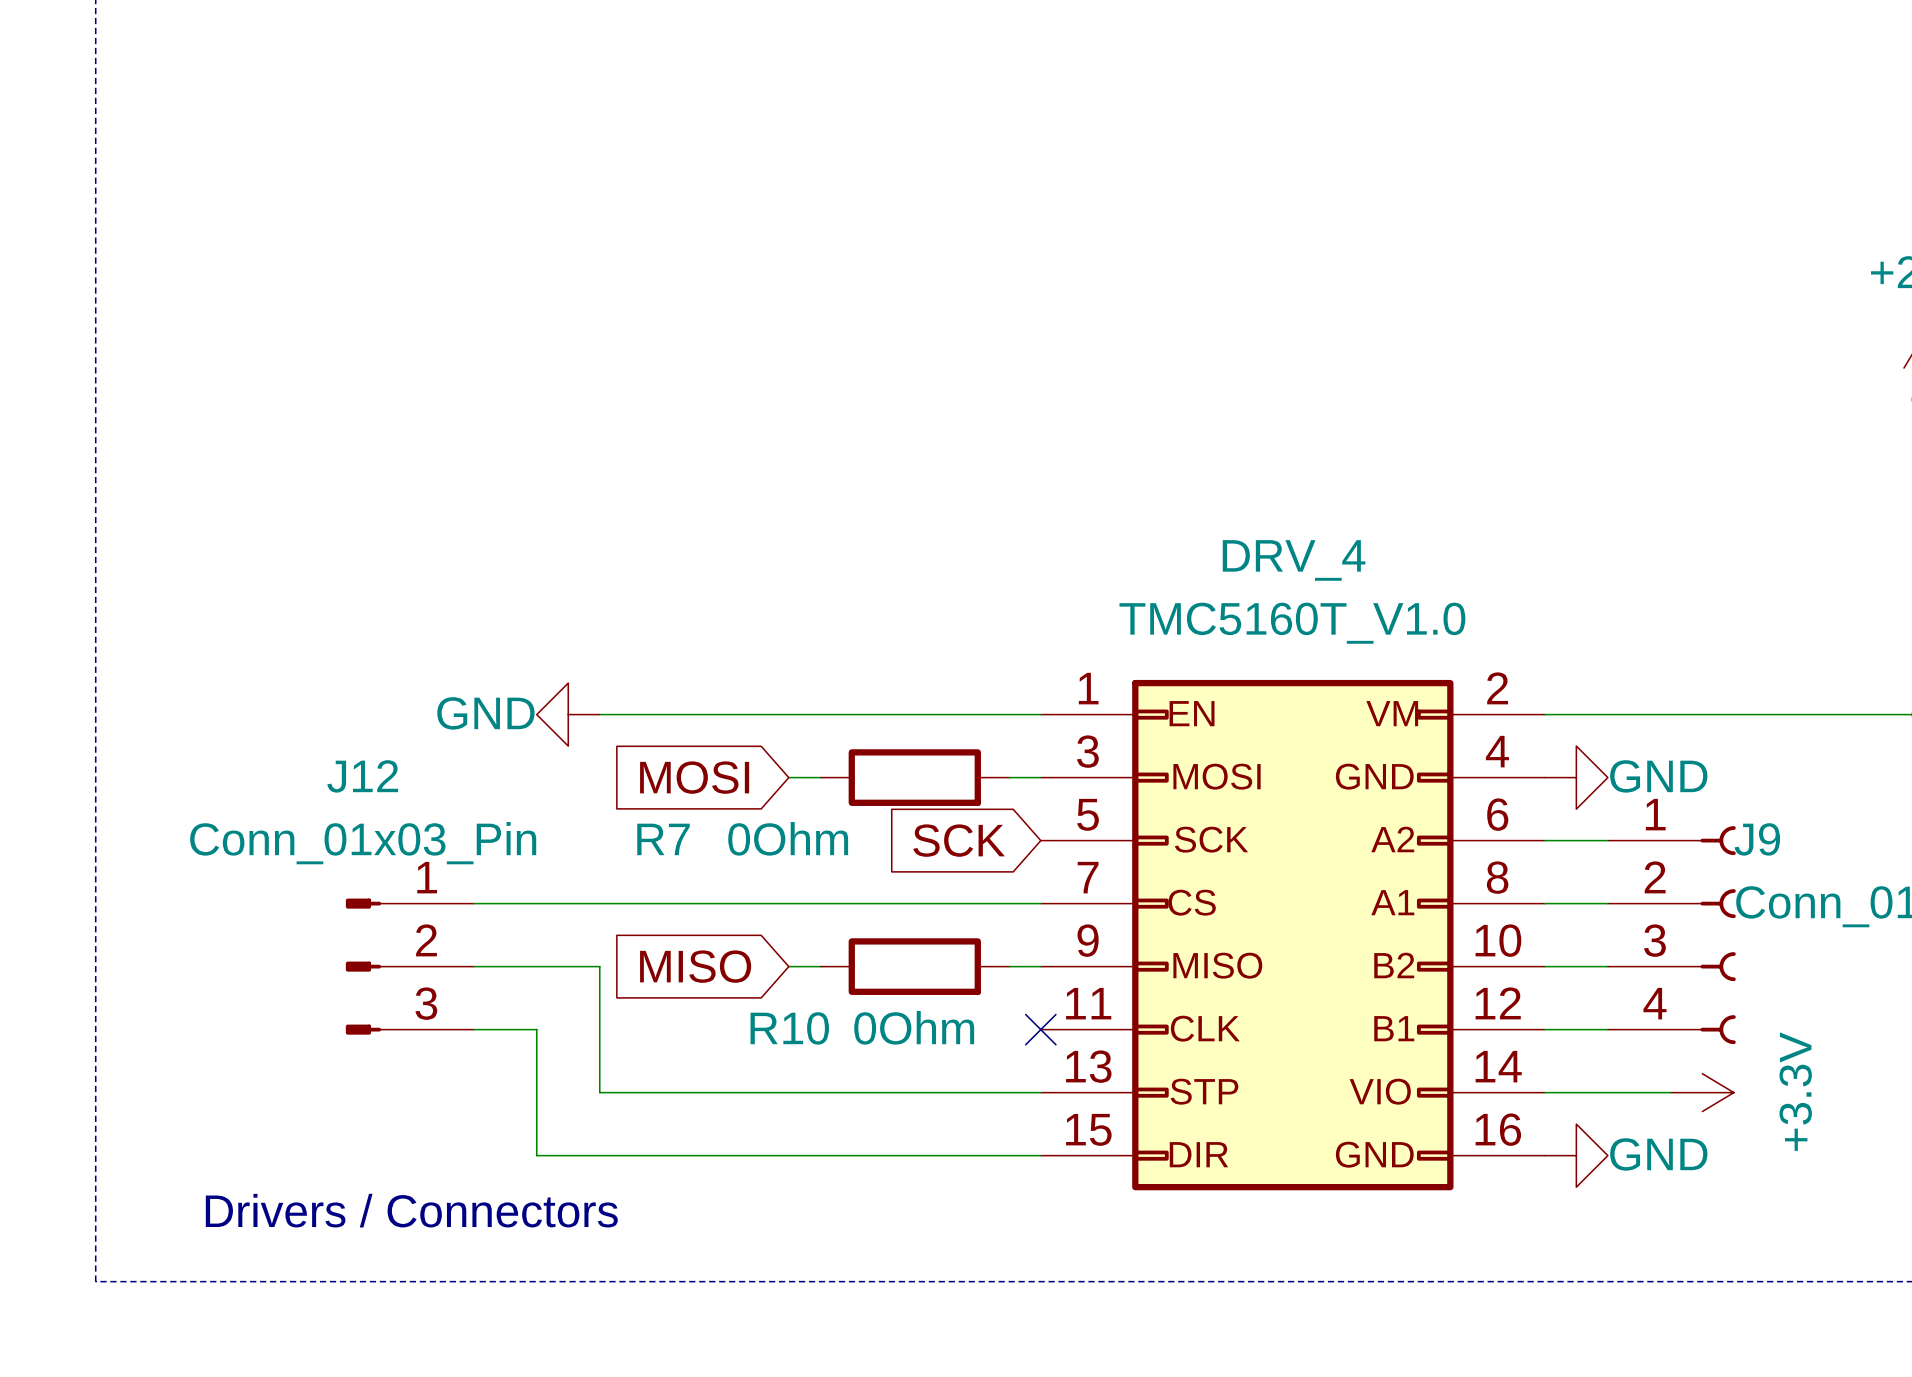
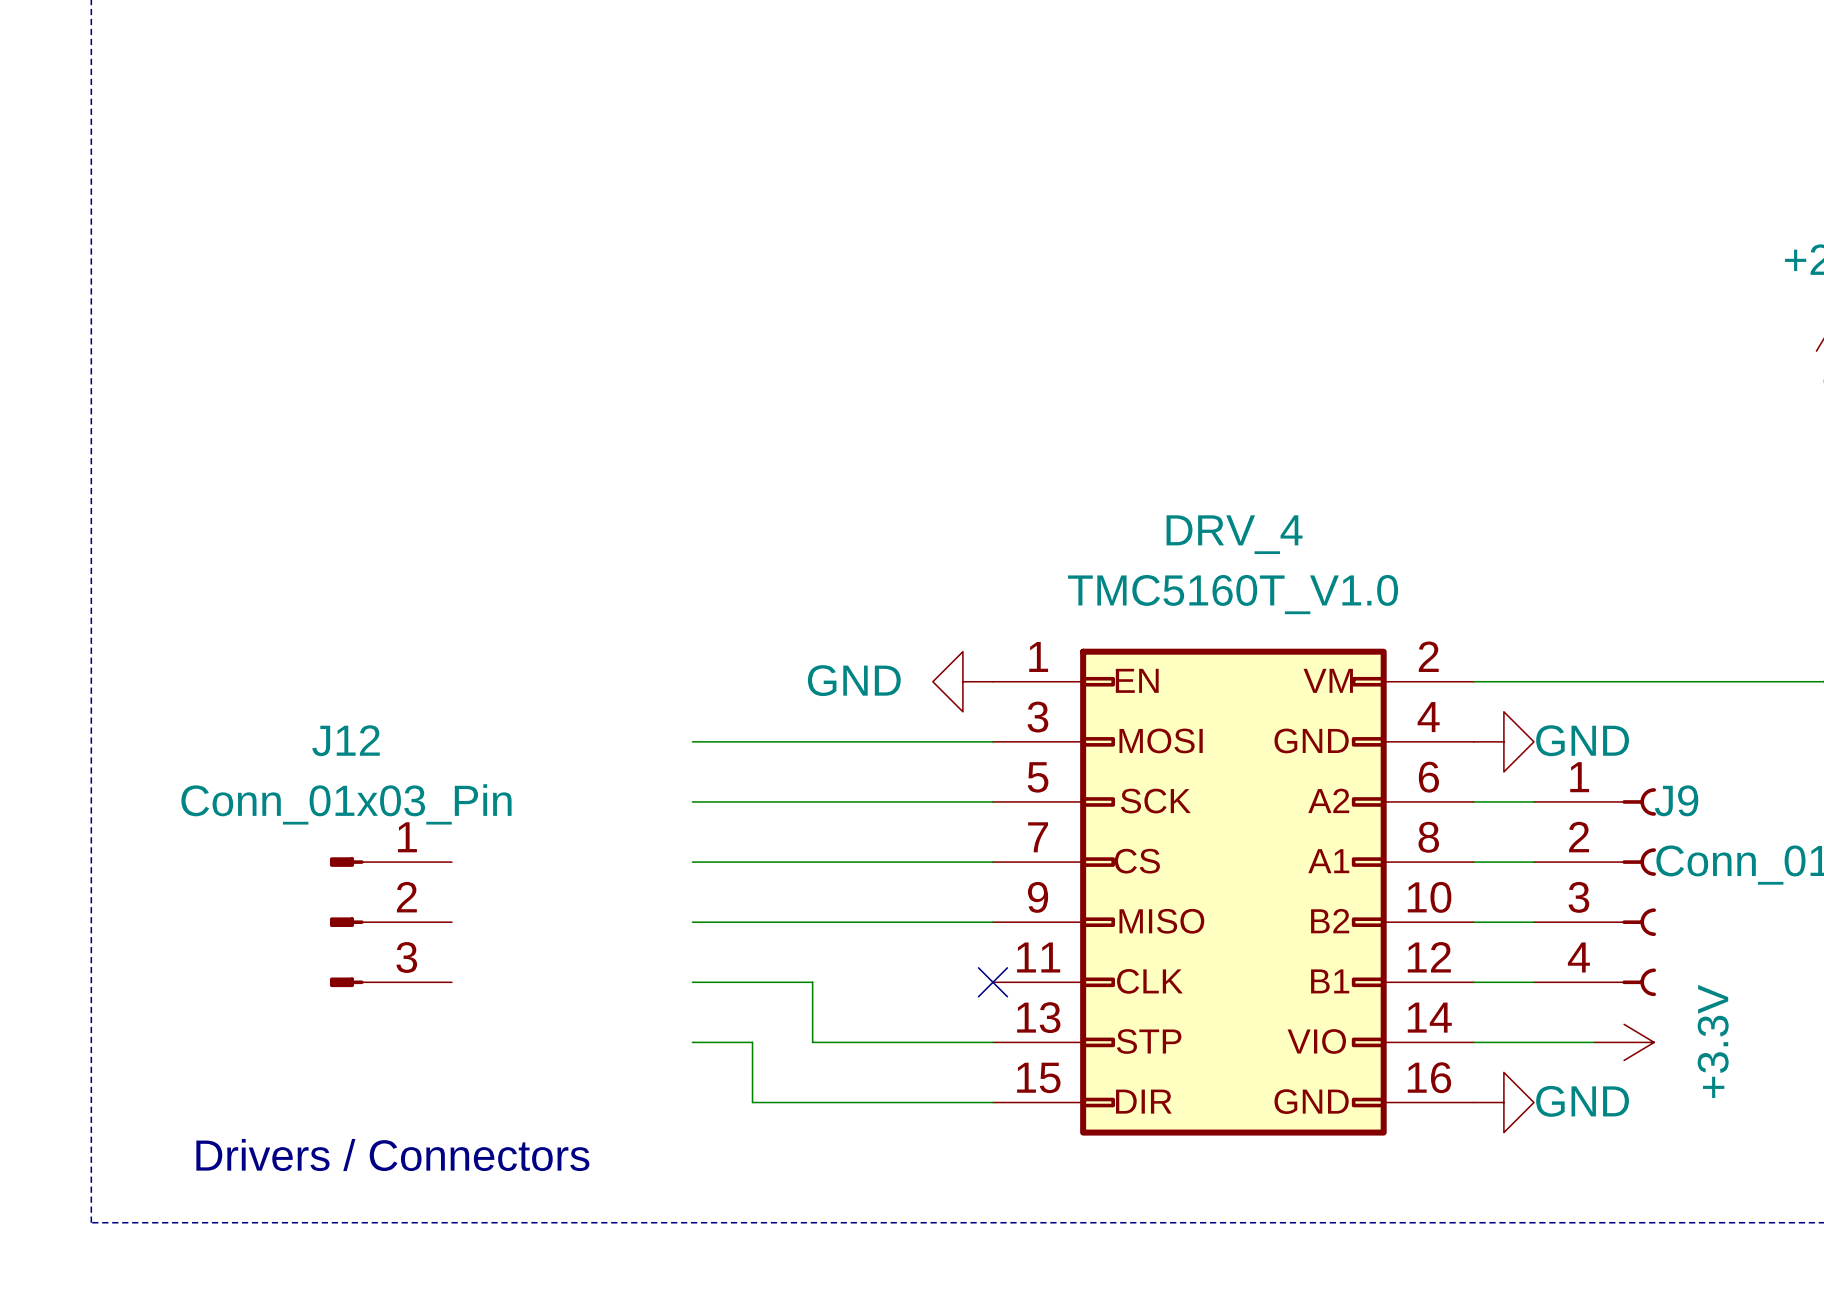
power symbol text position: GND (485, 713) -> GND (854, 680)
power symbol position: GND (568, 714) -> GND (962, 681)
wire: (599, 714) (1040, 714) -> none
global label: MOSI (694, 777) -> none
wire: none -> (692, 741) (752, 741)
wire: none -> (782, 741) (962, 741)
R7: 0Ohm (914, 777) -> none
wire: none -> (692, 801) (992, 801)
global label: SCK (959, 840) -> none
wire: (473, 903) (725, 903) -> none
wire: (473, 966) (599, 966) (599, 1092) (725, 1092) -> none
global label: MISO (695, 966) -> none
wire: none -> (692, 922) (752, 922)
wire: none -> (782, 922) (962, 922)
R10: 0Ohm (914, 966) -> none
wire: (473, 1029) (536, 1029) (536, 1155) (788, 1155) -> (752, 1042) (752, 1102)
wire: (788, 1092) (851, 1092) -> (692, 982) (812, 982) (812, 1042)

